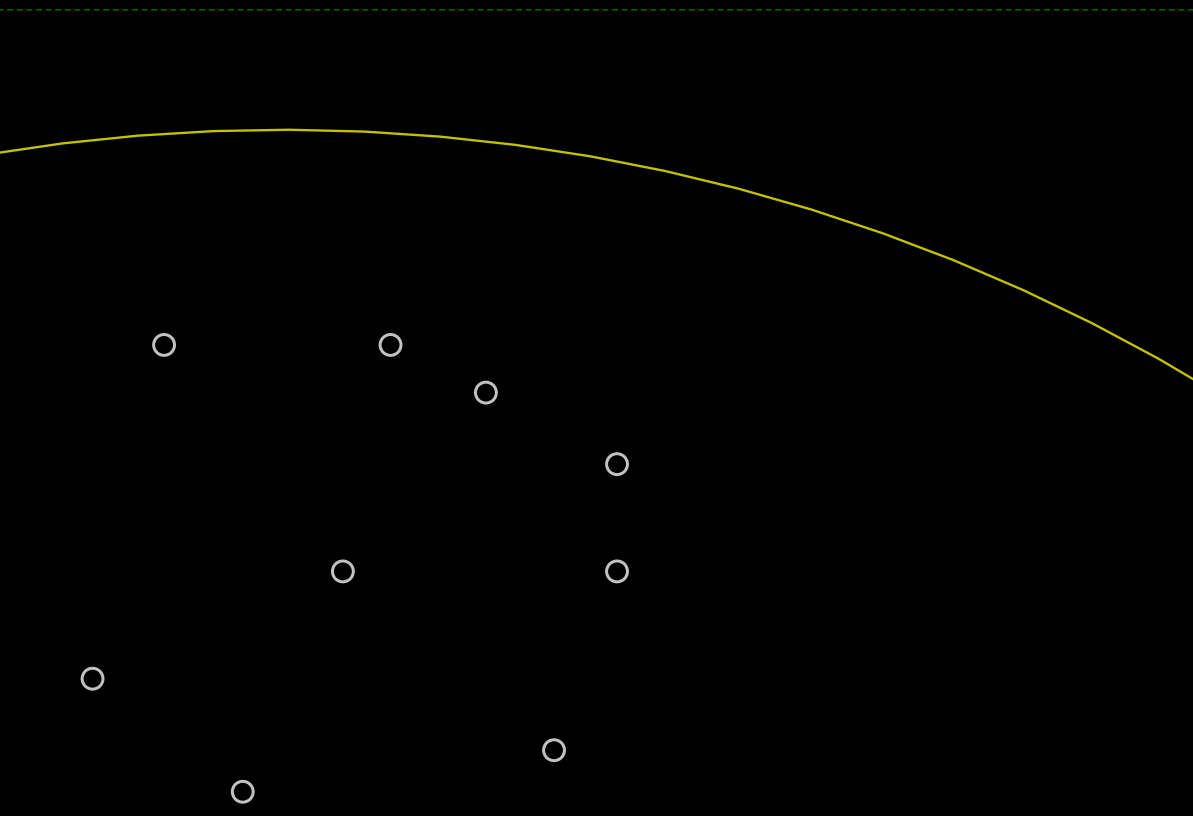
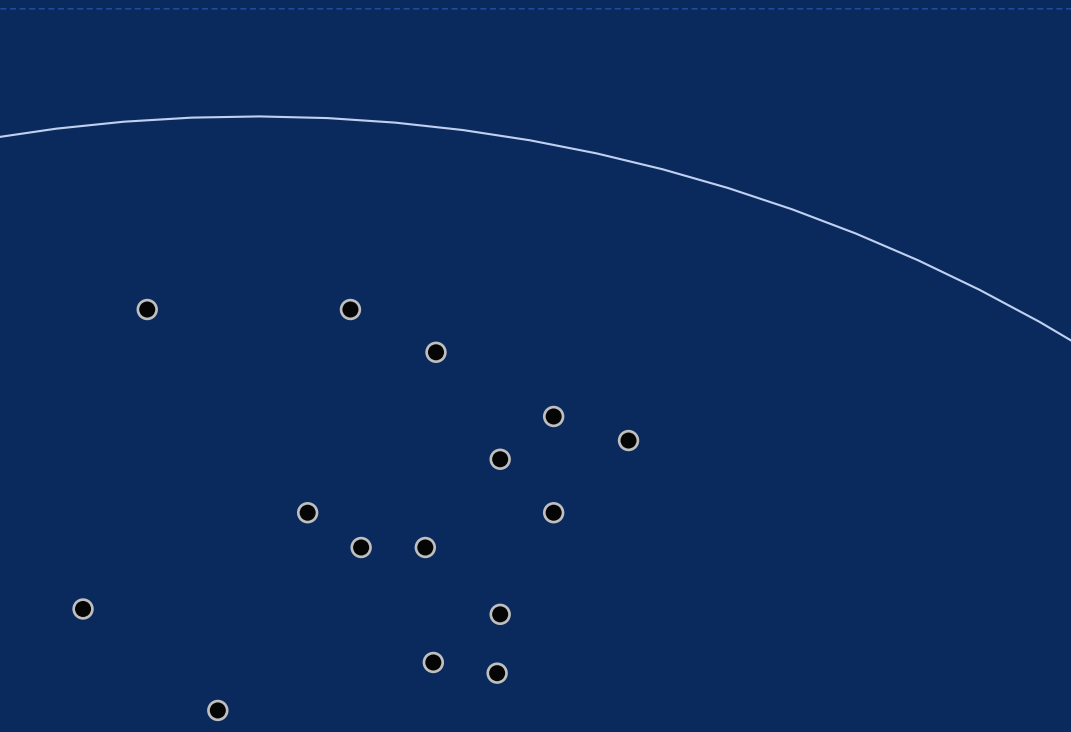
via: none -> (628, 440)
via: none -> (500, 459)
via: none -> (361, 547)
via: none -> (425, 547)
via: none -> (500, 614)
via: none -> (433, 662)

